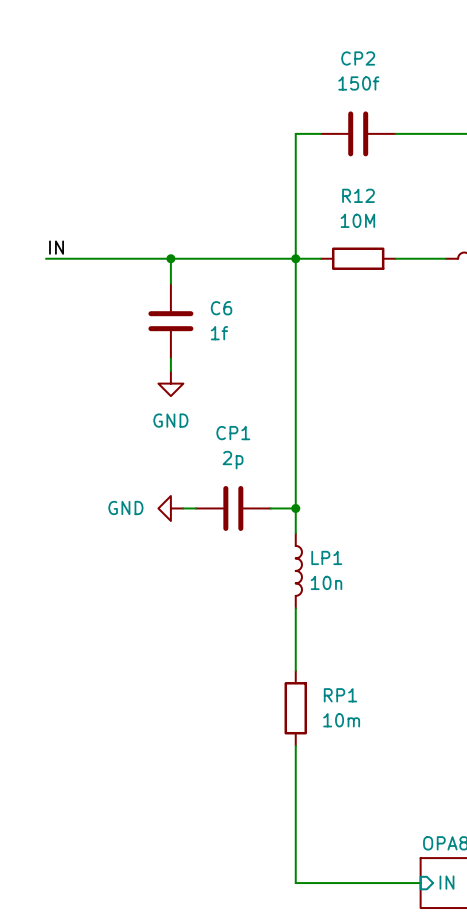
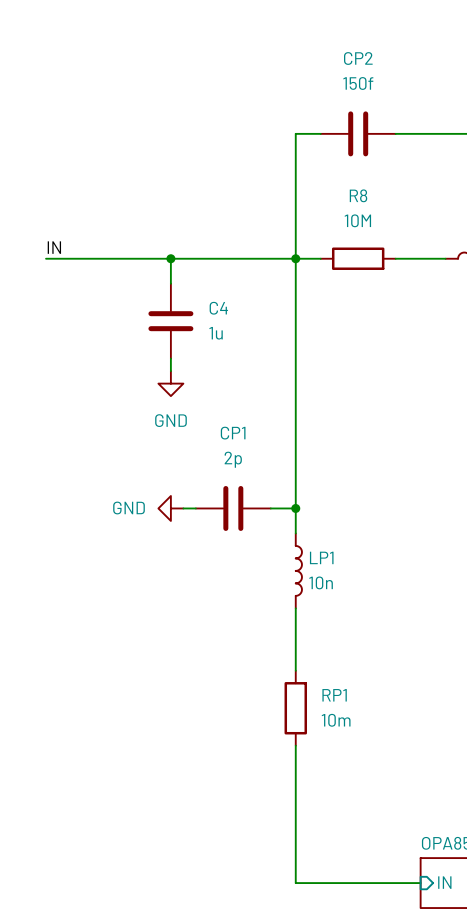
R12 name: R12 (358, 195) -> R8 (358, 195)
C6 name: C6 (221, 308) -> C4 (218, 308)
C6 value: 1f (219, 333) -> 1u (216, 333)

